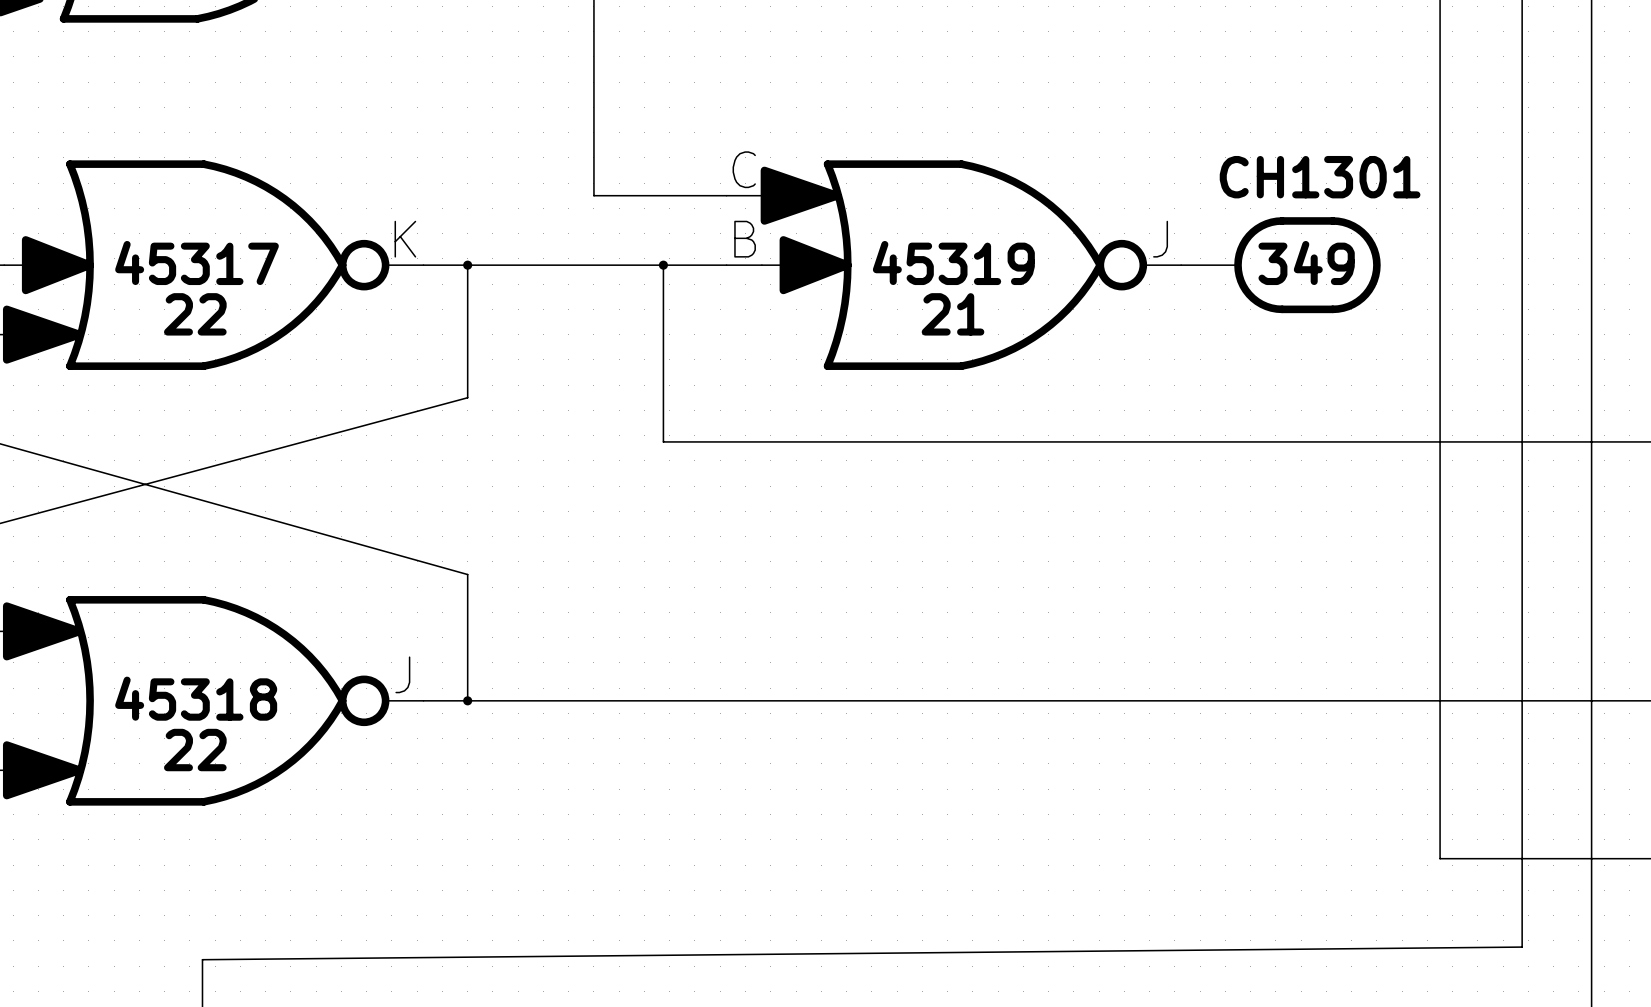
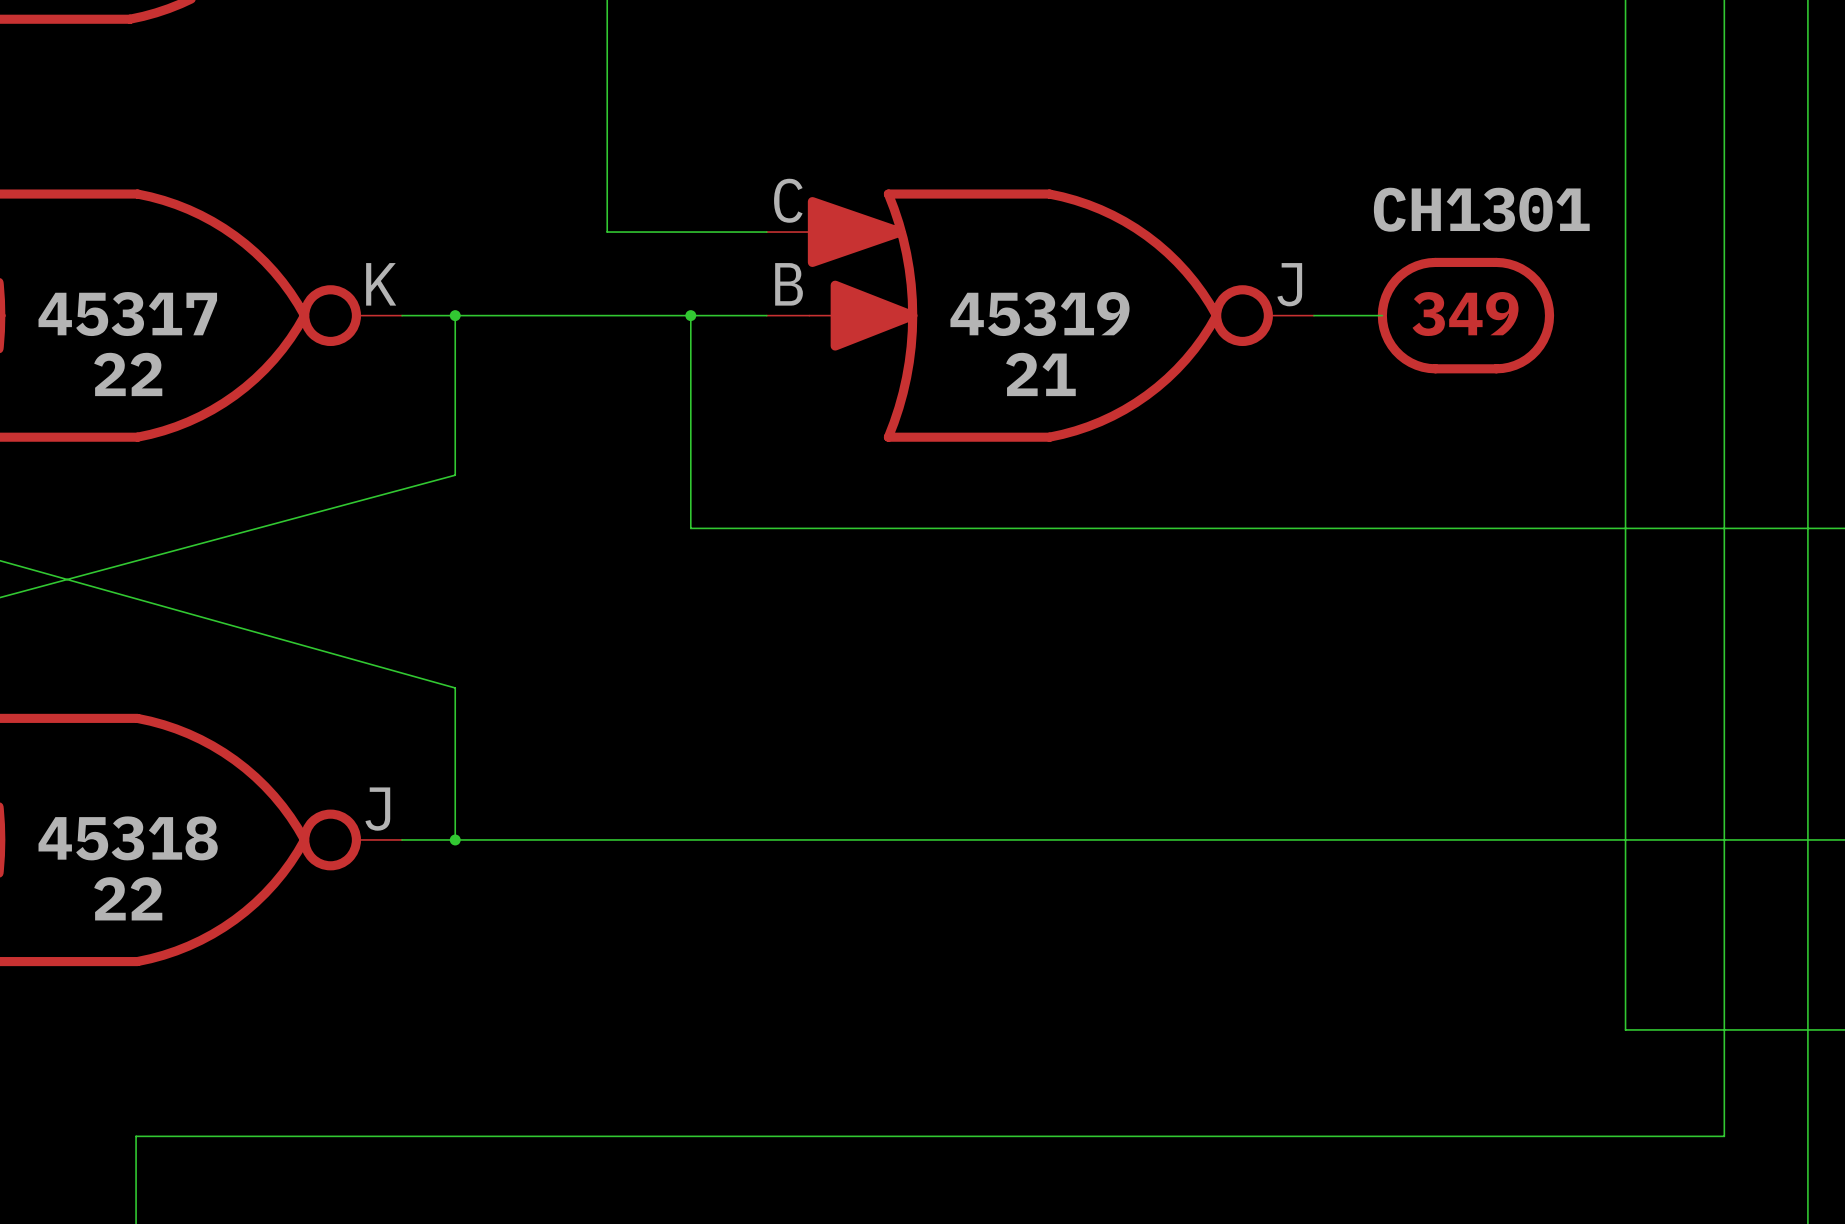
wire: (1522, 947) (202, 959) -> (1724, 1136) (136, 1136) (136, 1151)

